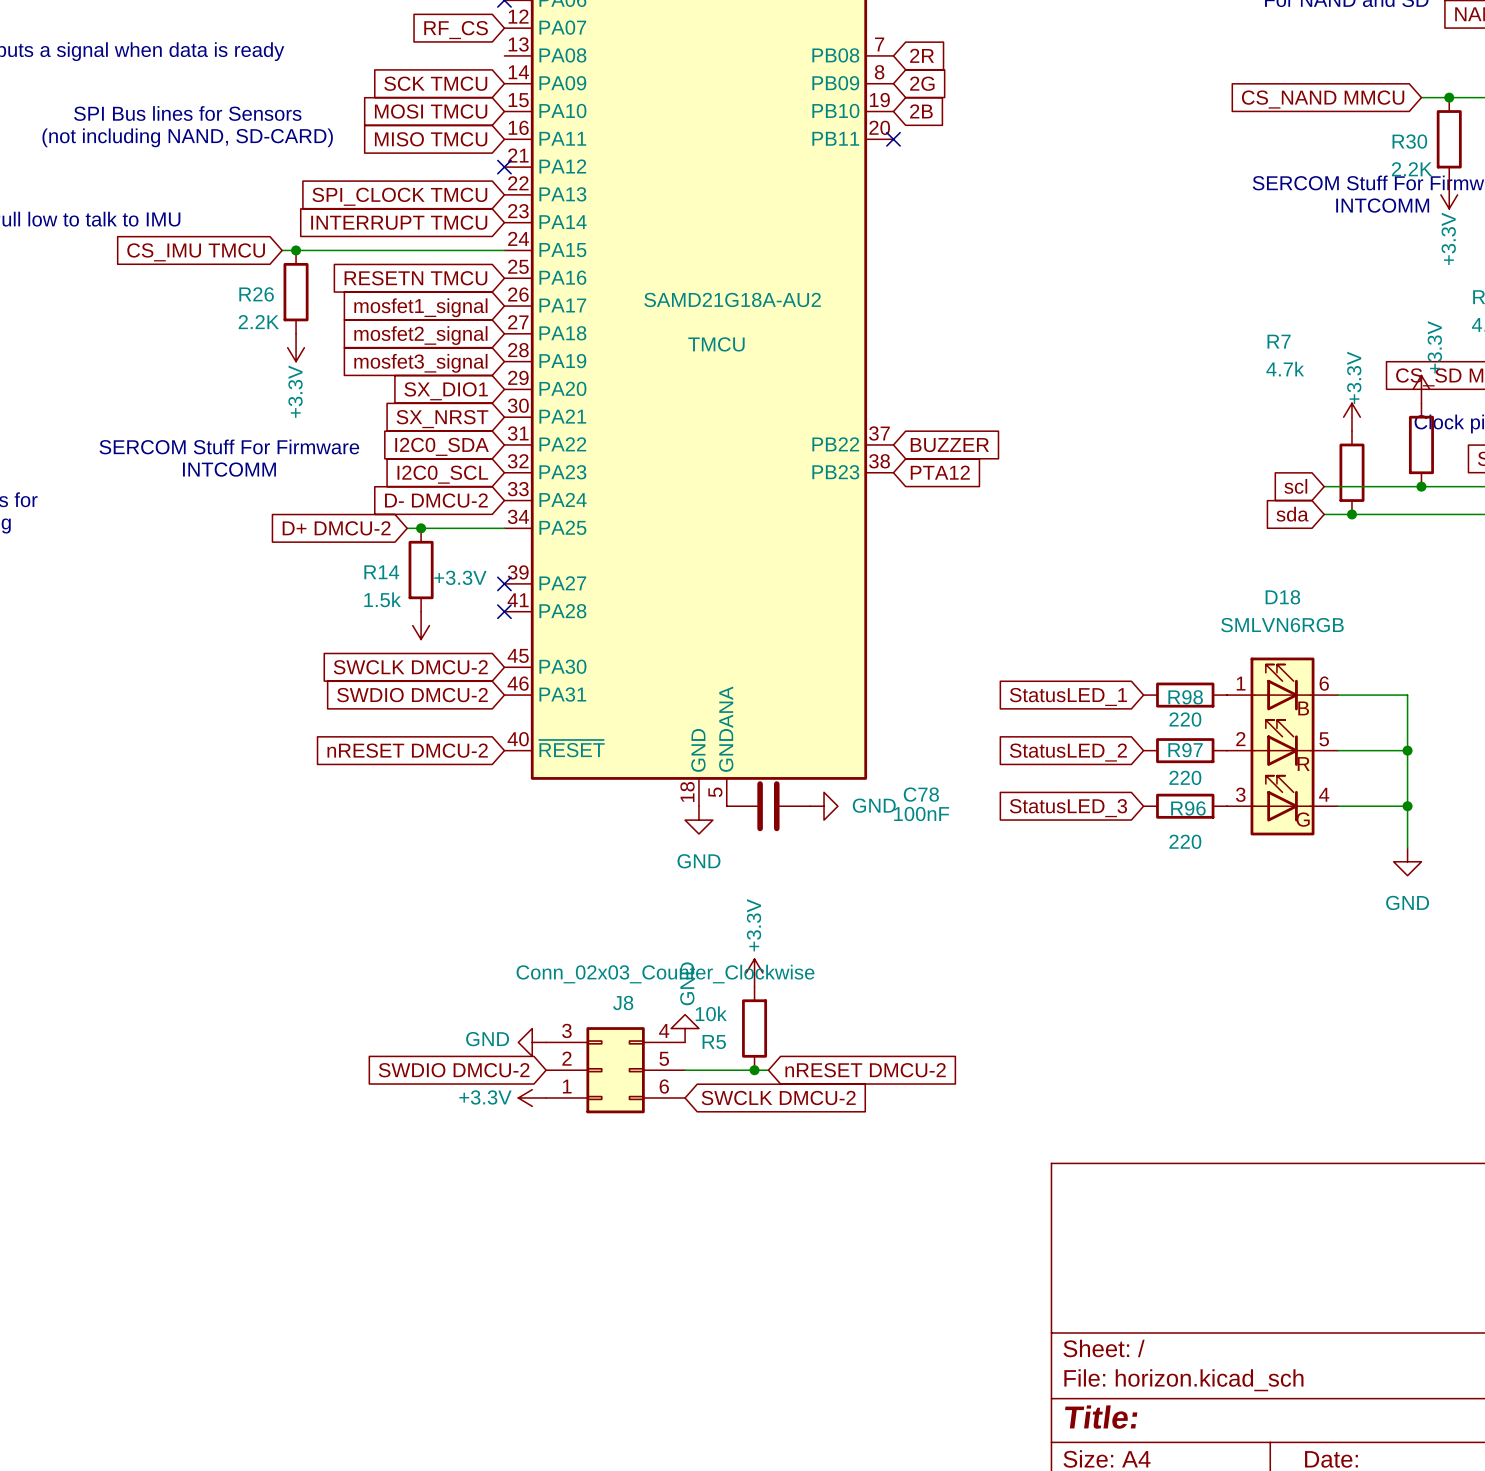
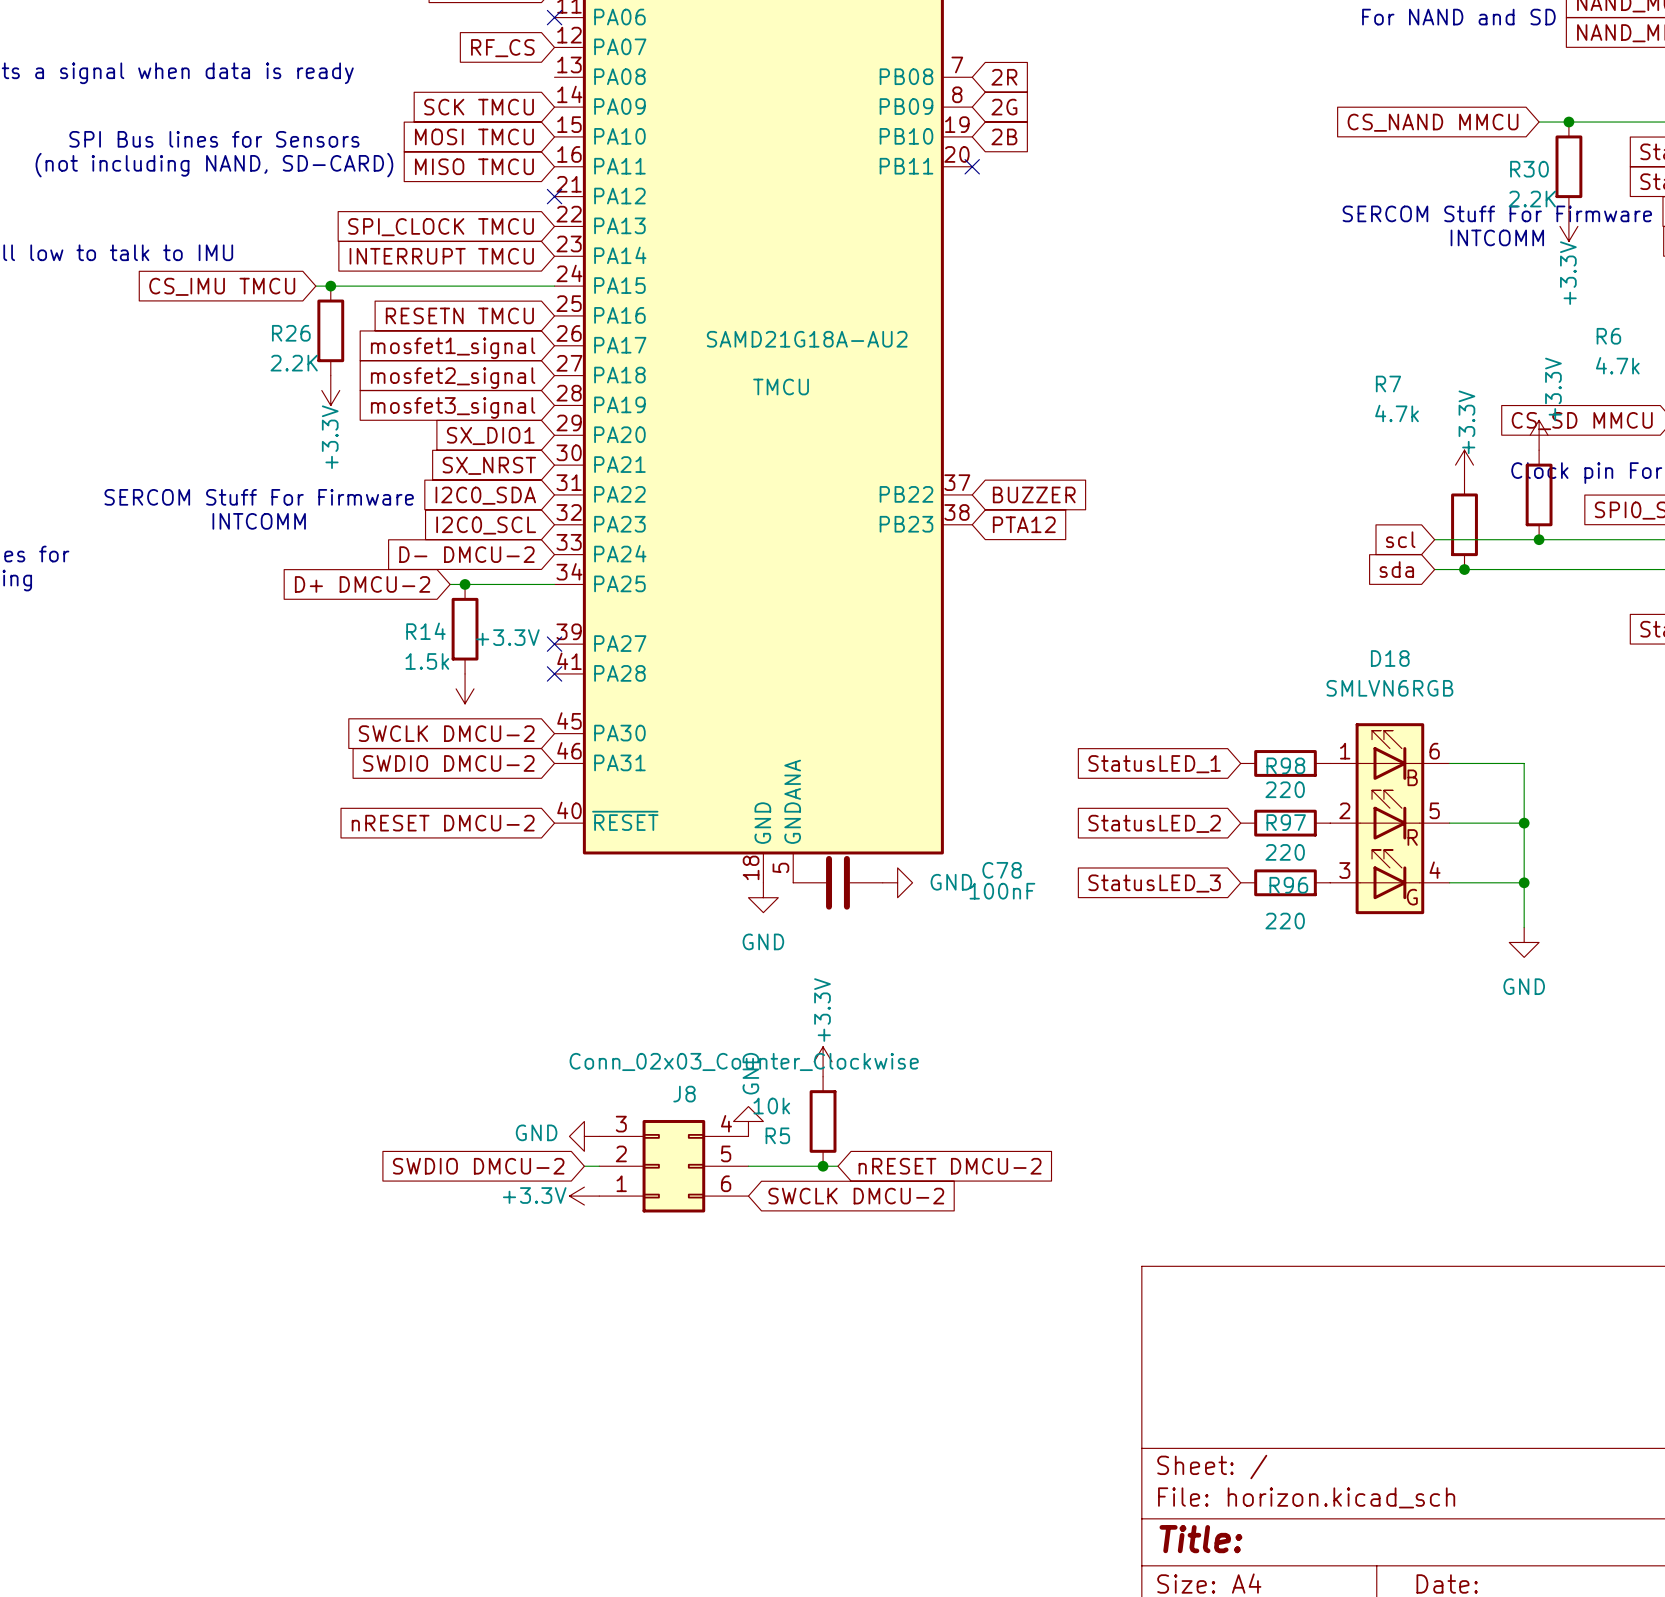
global label position: SWDIO DMCU-2 (454, 1070) -> SWDIO DMCU-2 (478, 1166)
wire: none -> (584, 1166) (599, 1166)

